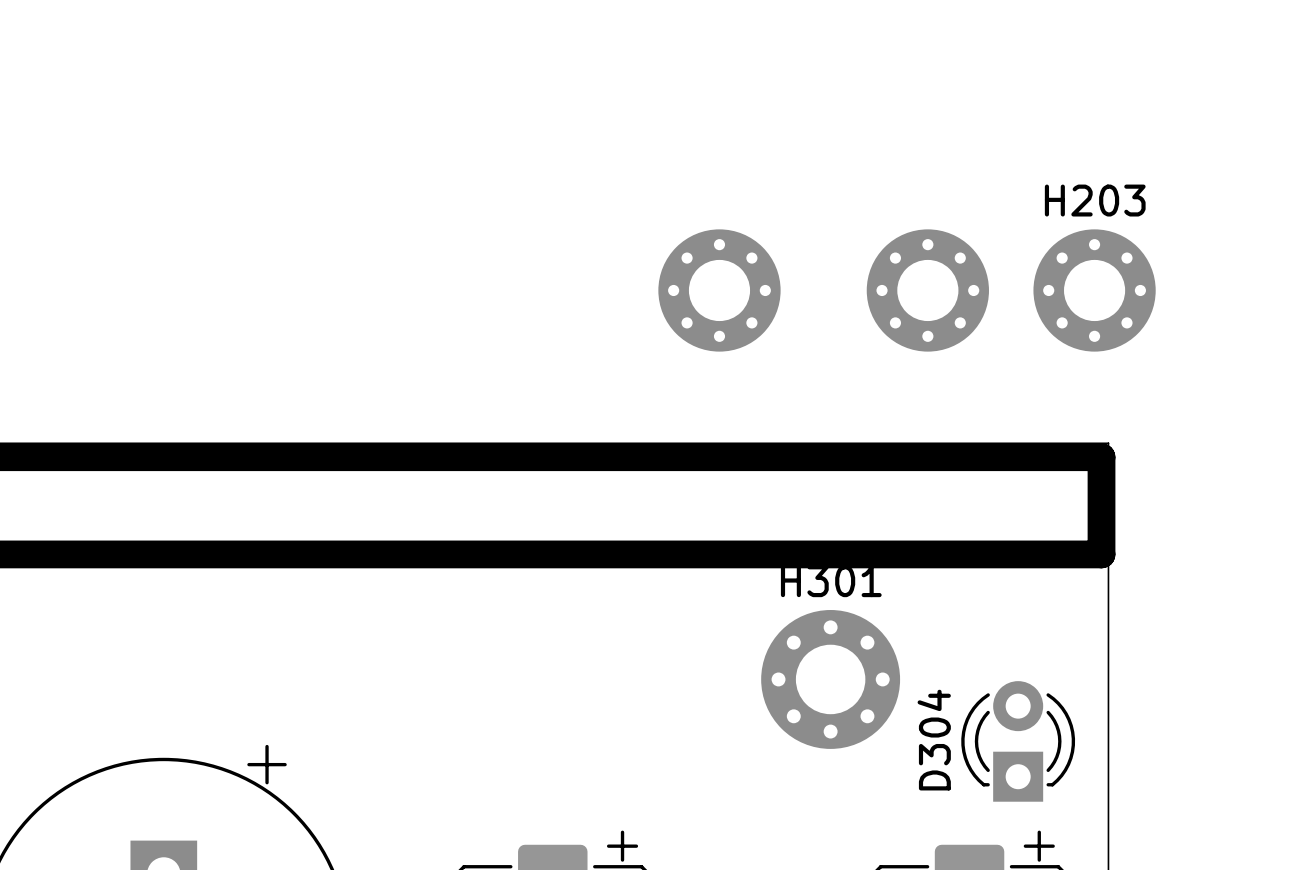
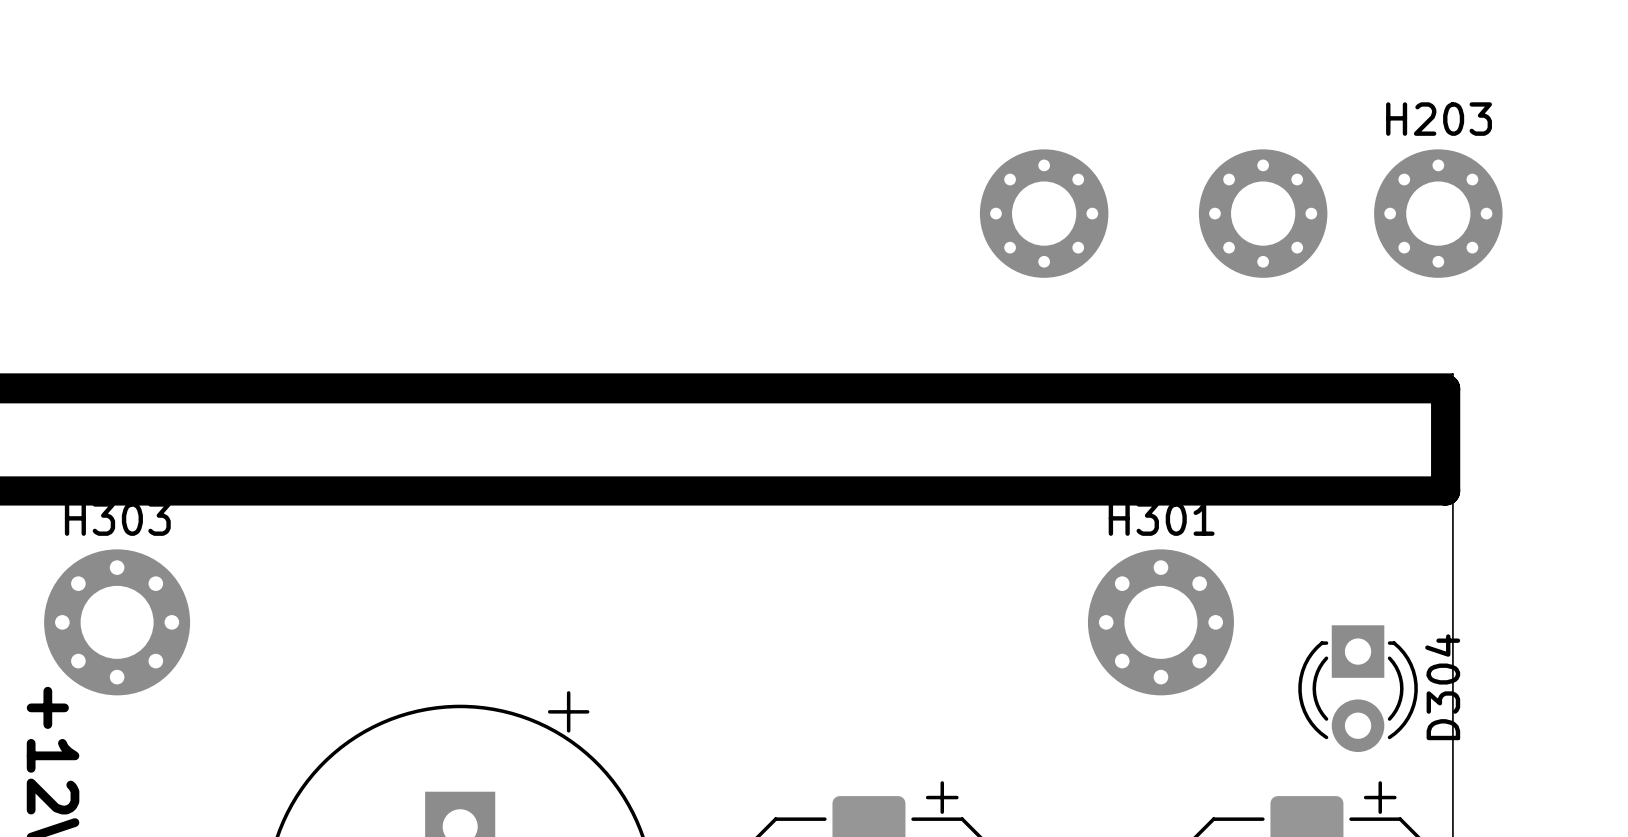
D304 rotation: 0° (1018, 741) -> 180° (1358, 688)

